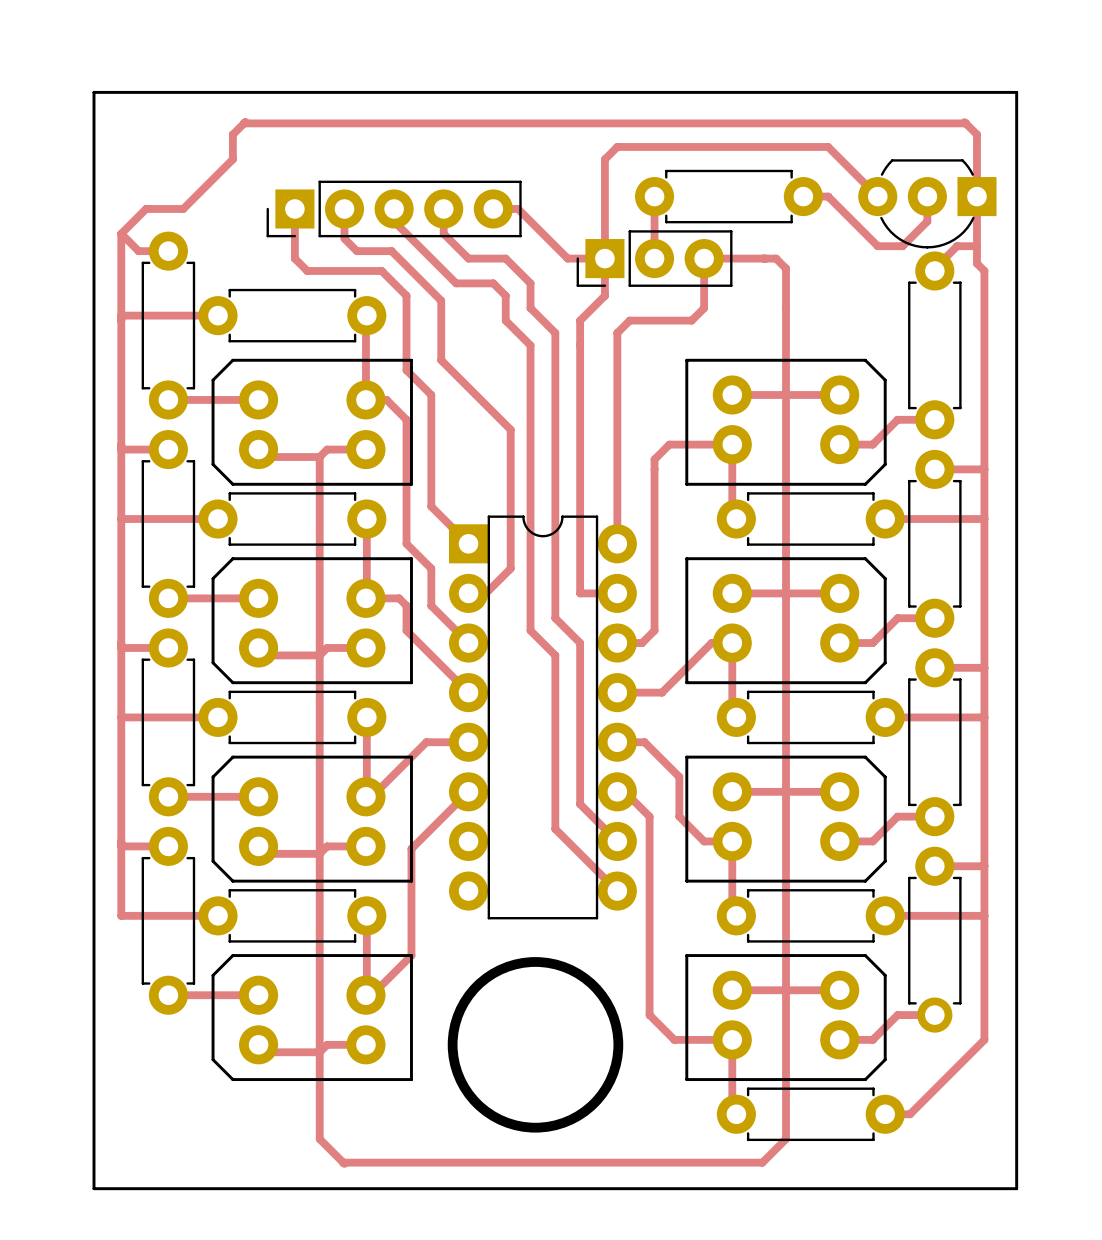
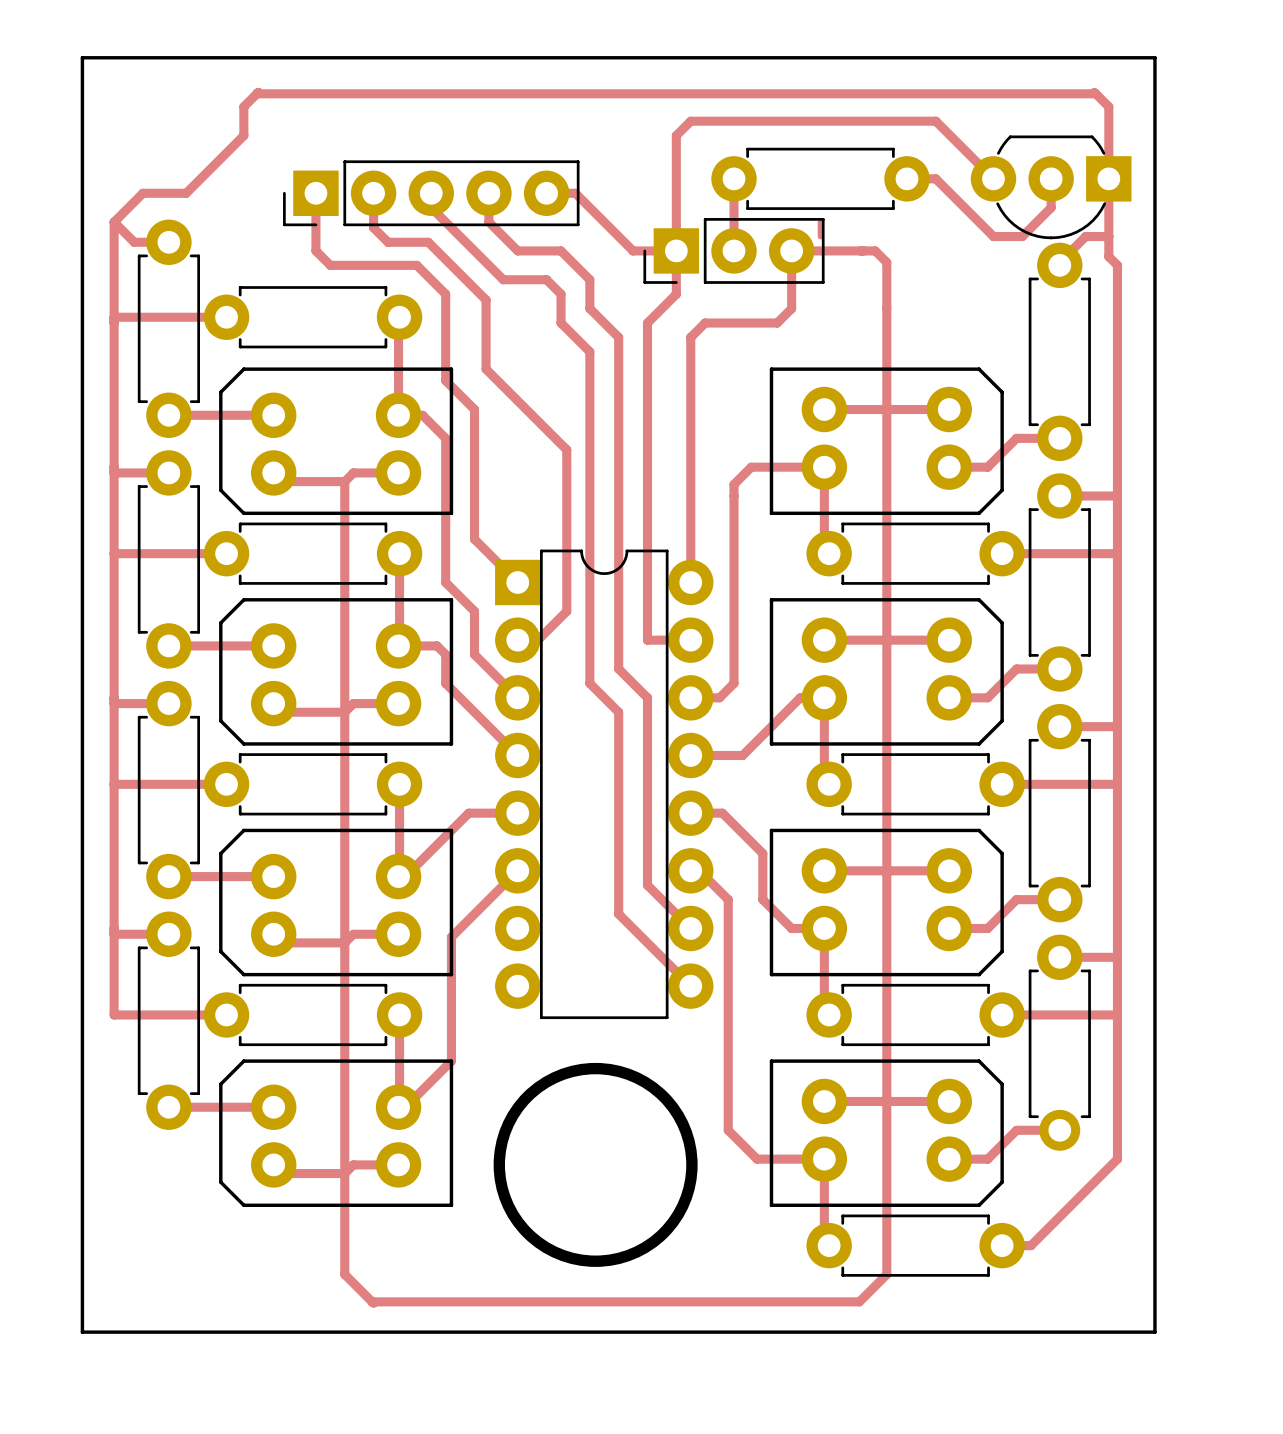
track: none -> (820, 222) (820, 236)

